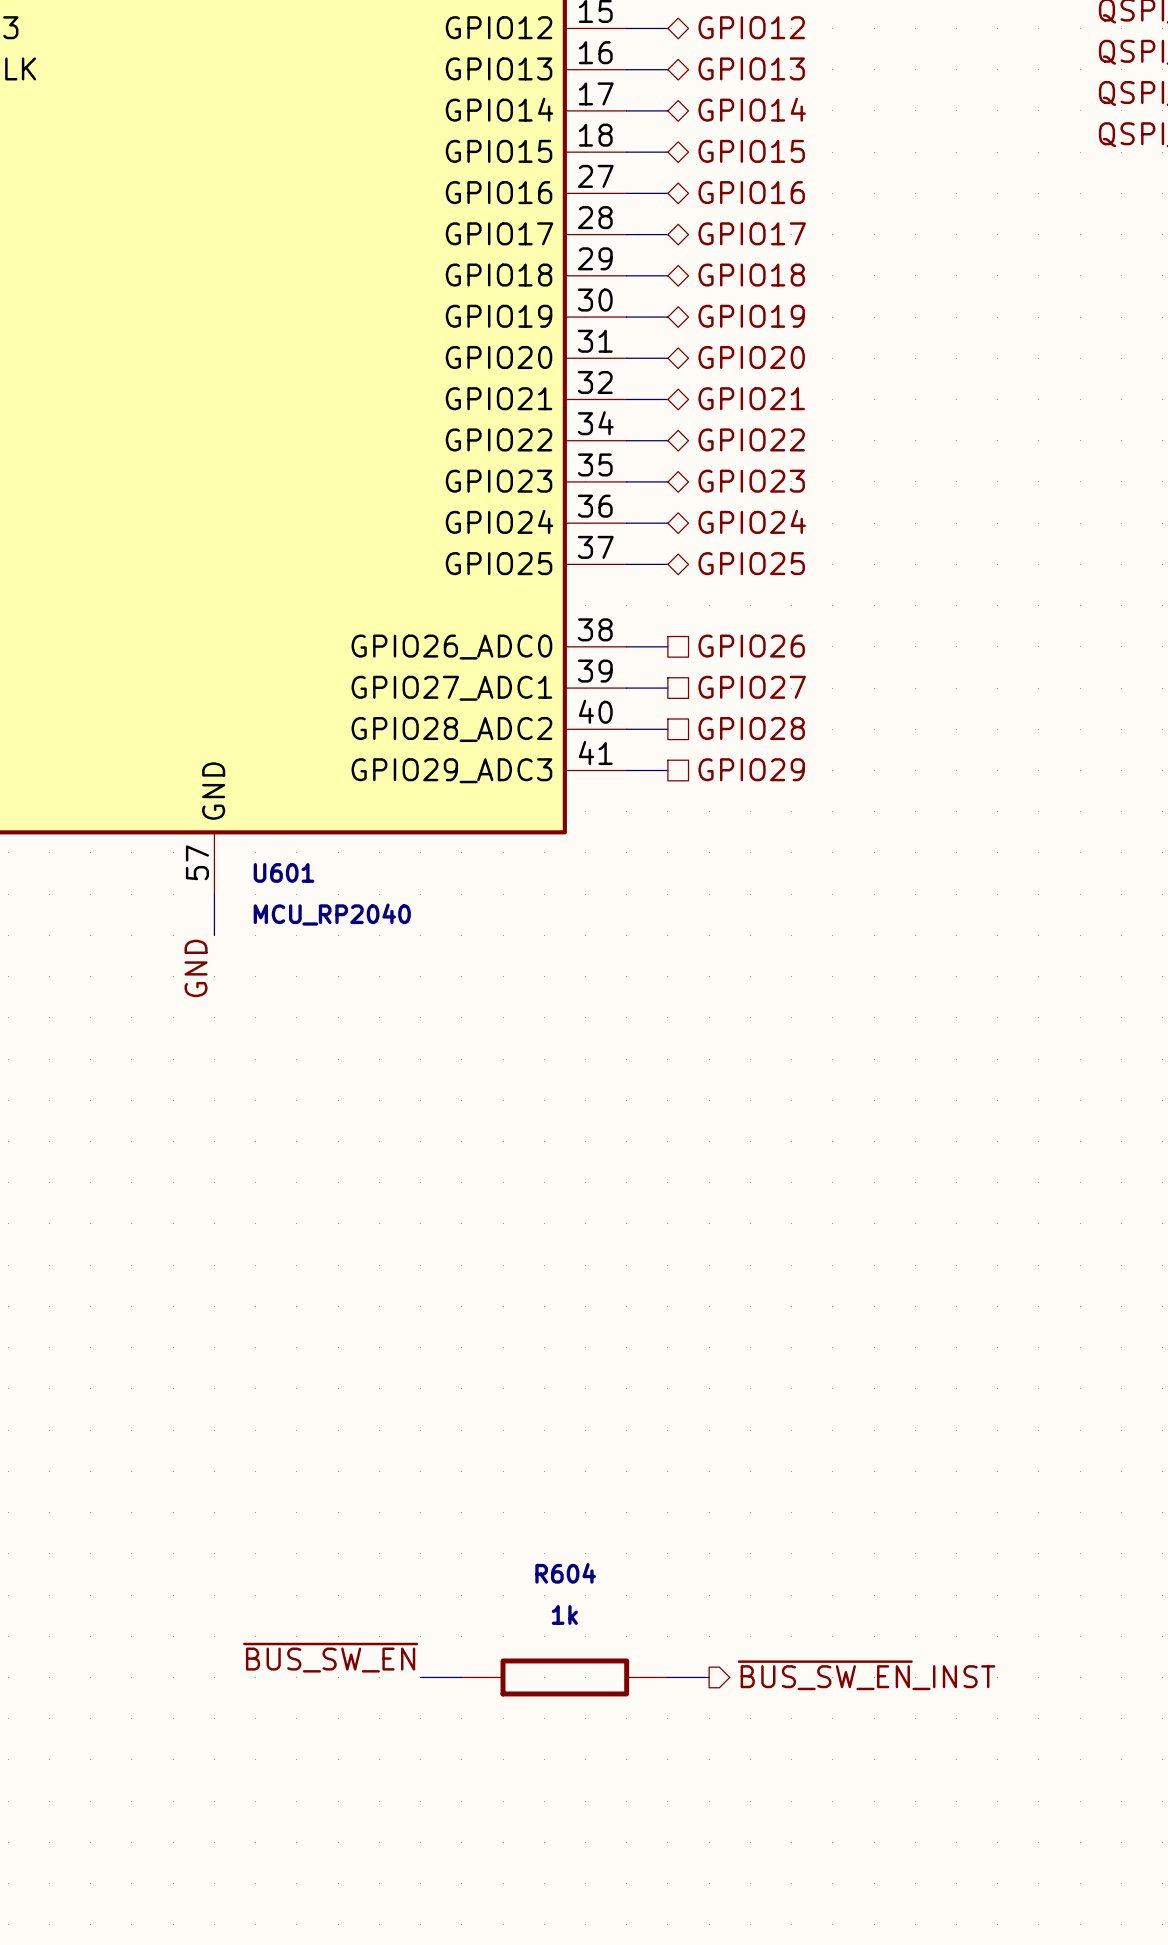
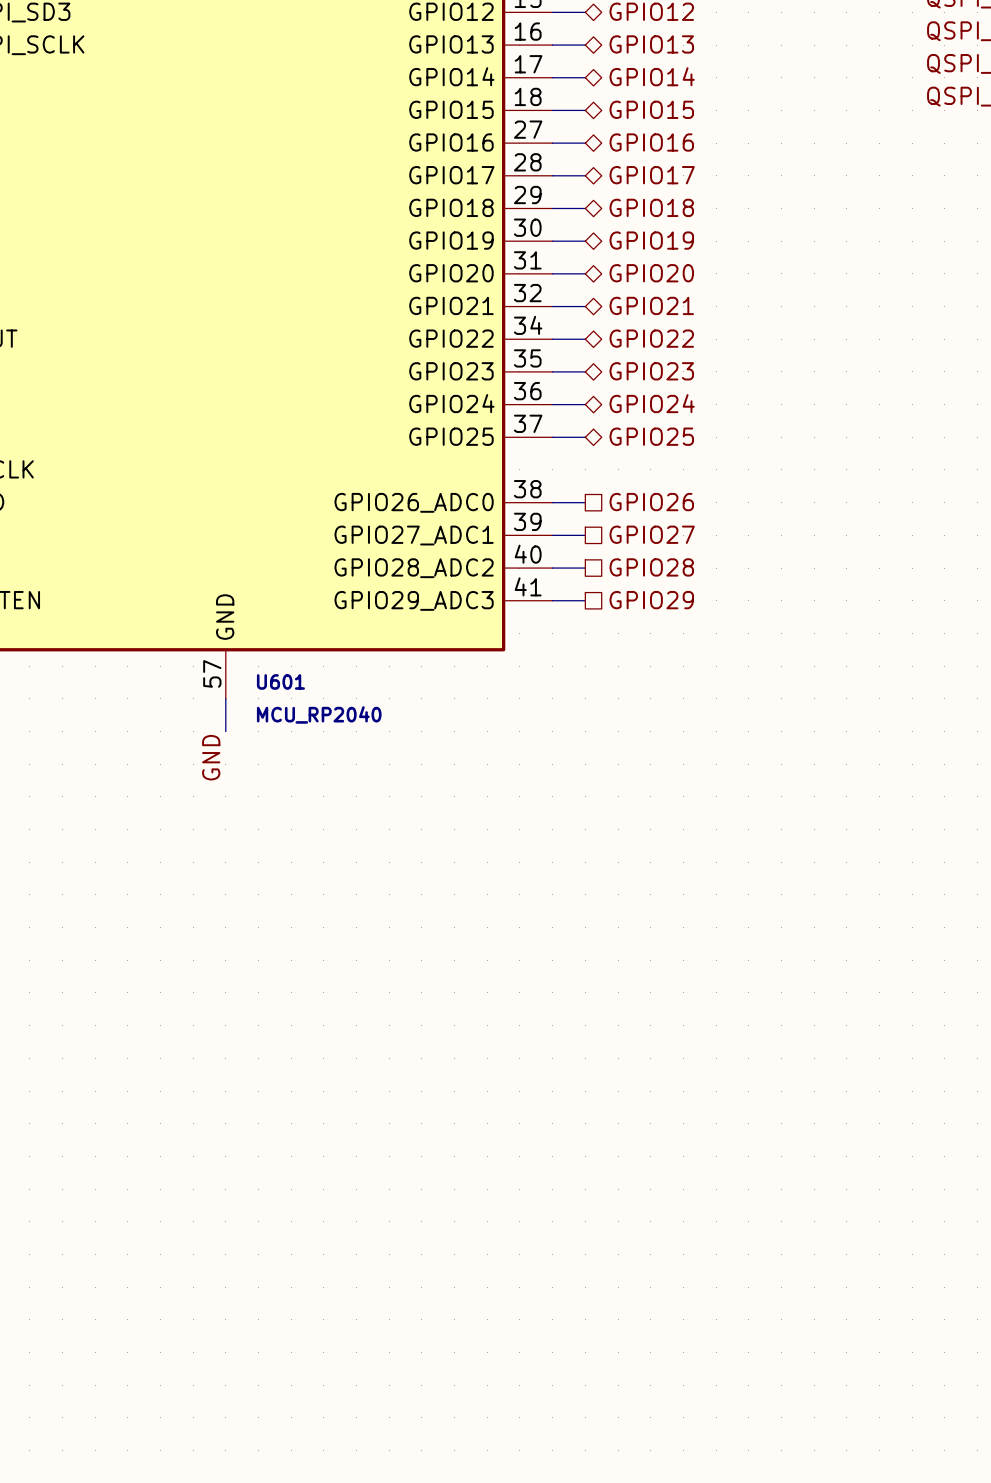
label: ~{BUS_SW_EN} (330, 1657) -> none
hierarchical label: ~{BUS_SW_EN}_INST (866, 1675) -> none
wire: (420, 1677) (461, 1677) -> none
R604: 1k (564, 1677) -> none
wire: (667, 1677) (709, 1677) -> none

